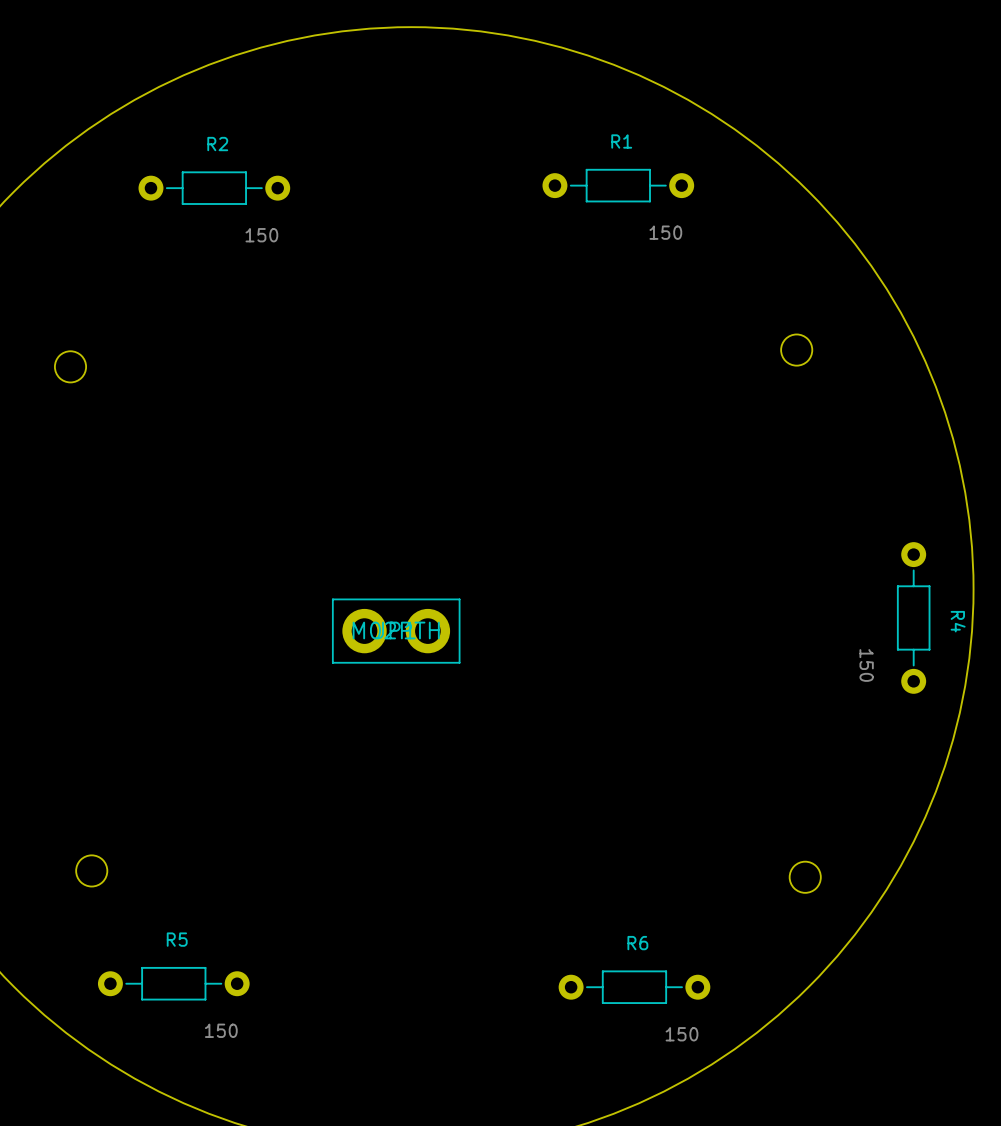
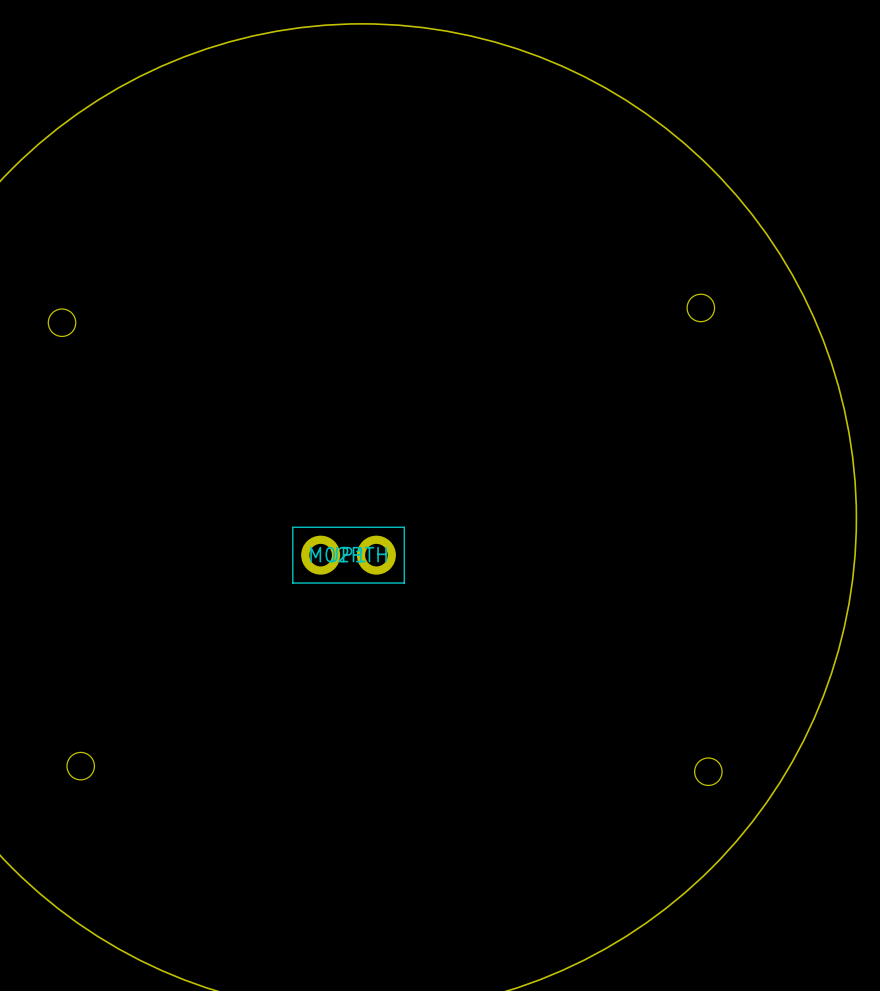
R1: 150 (618, 185) -> none
R2: 150 (214, 188) -> none
R4: 150 (913, 617) -> none
R5: 150 (173, 983) -> none
R6: 150 (634, 987) -> none

